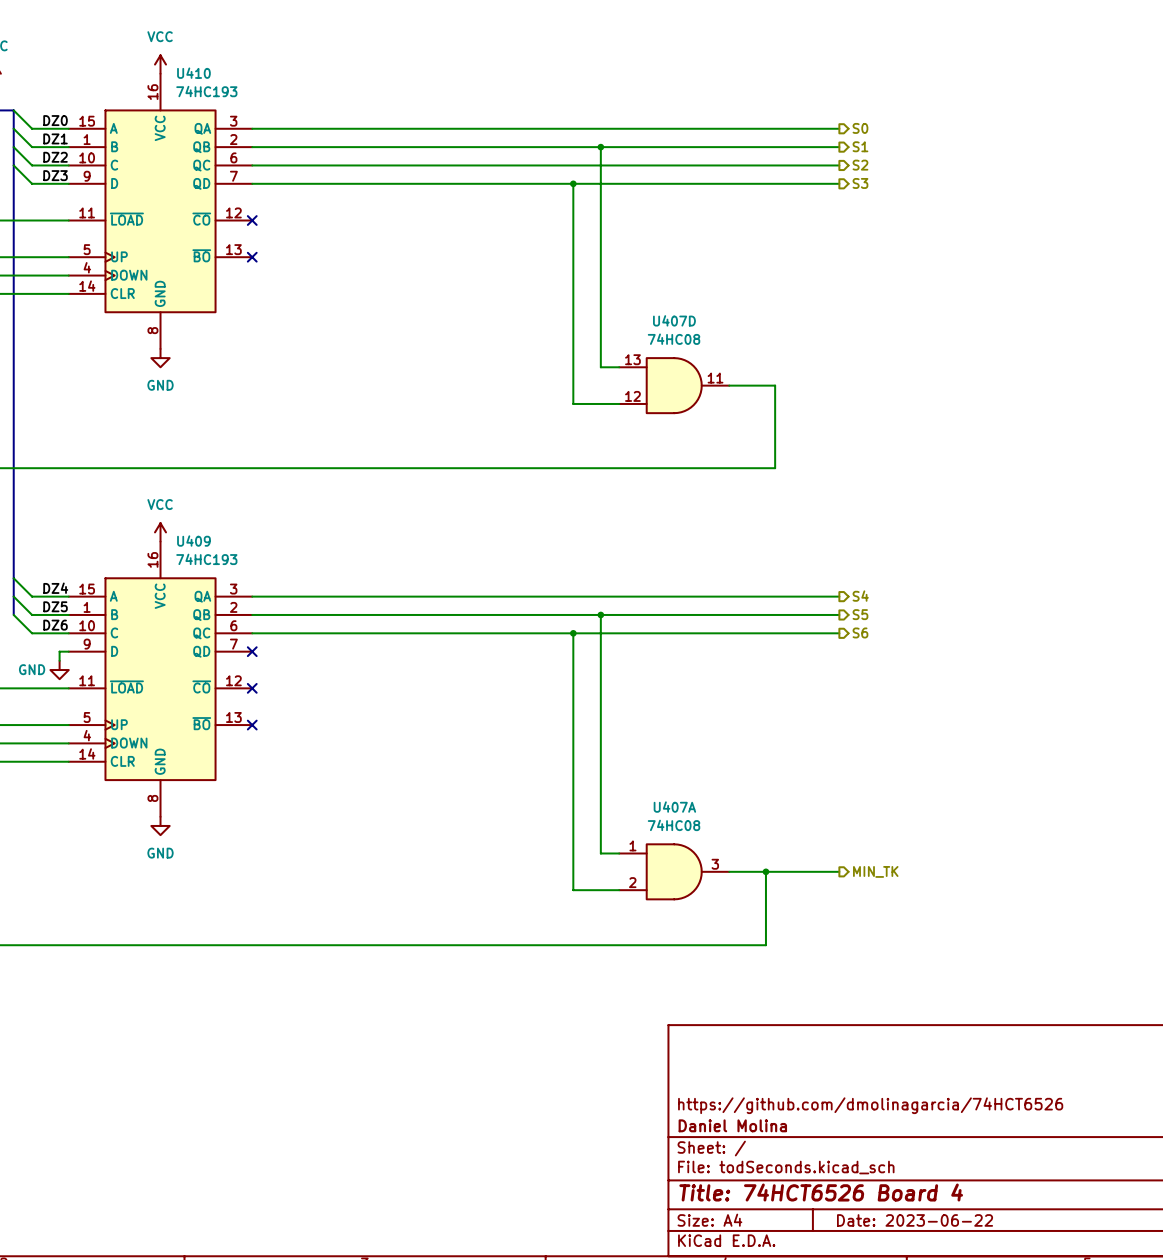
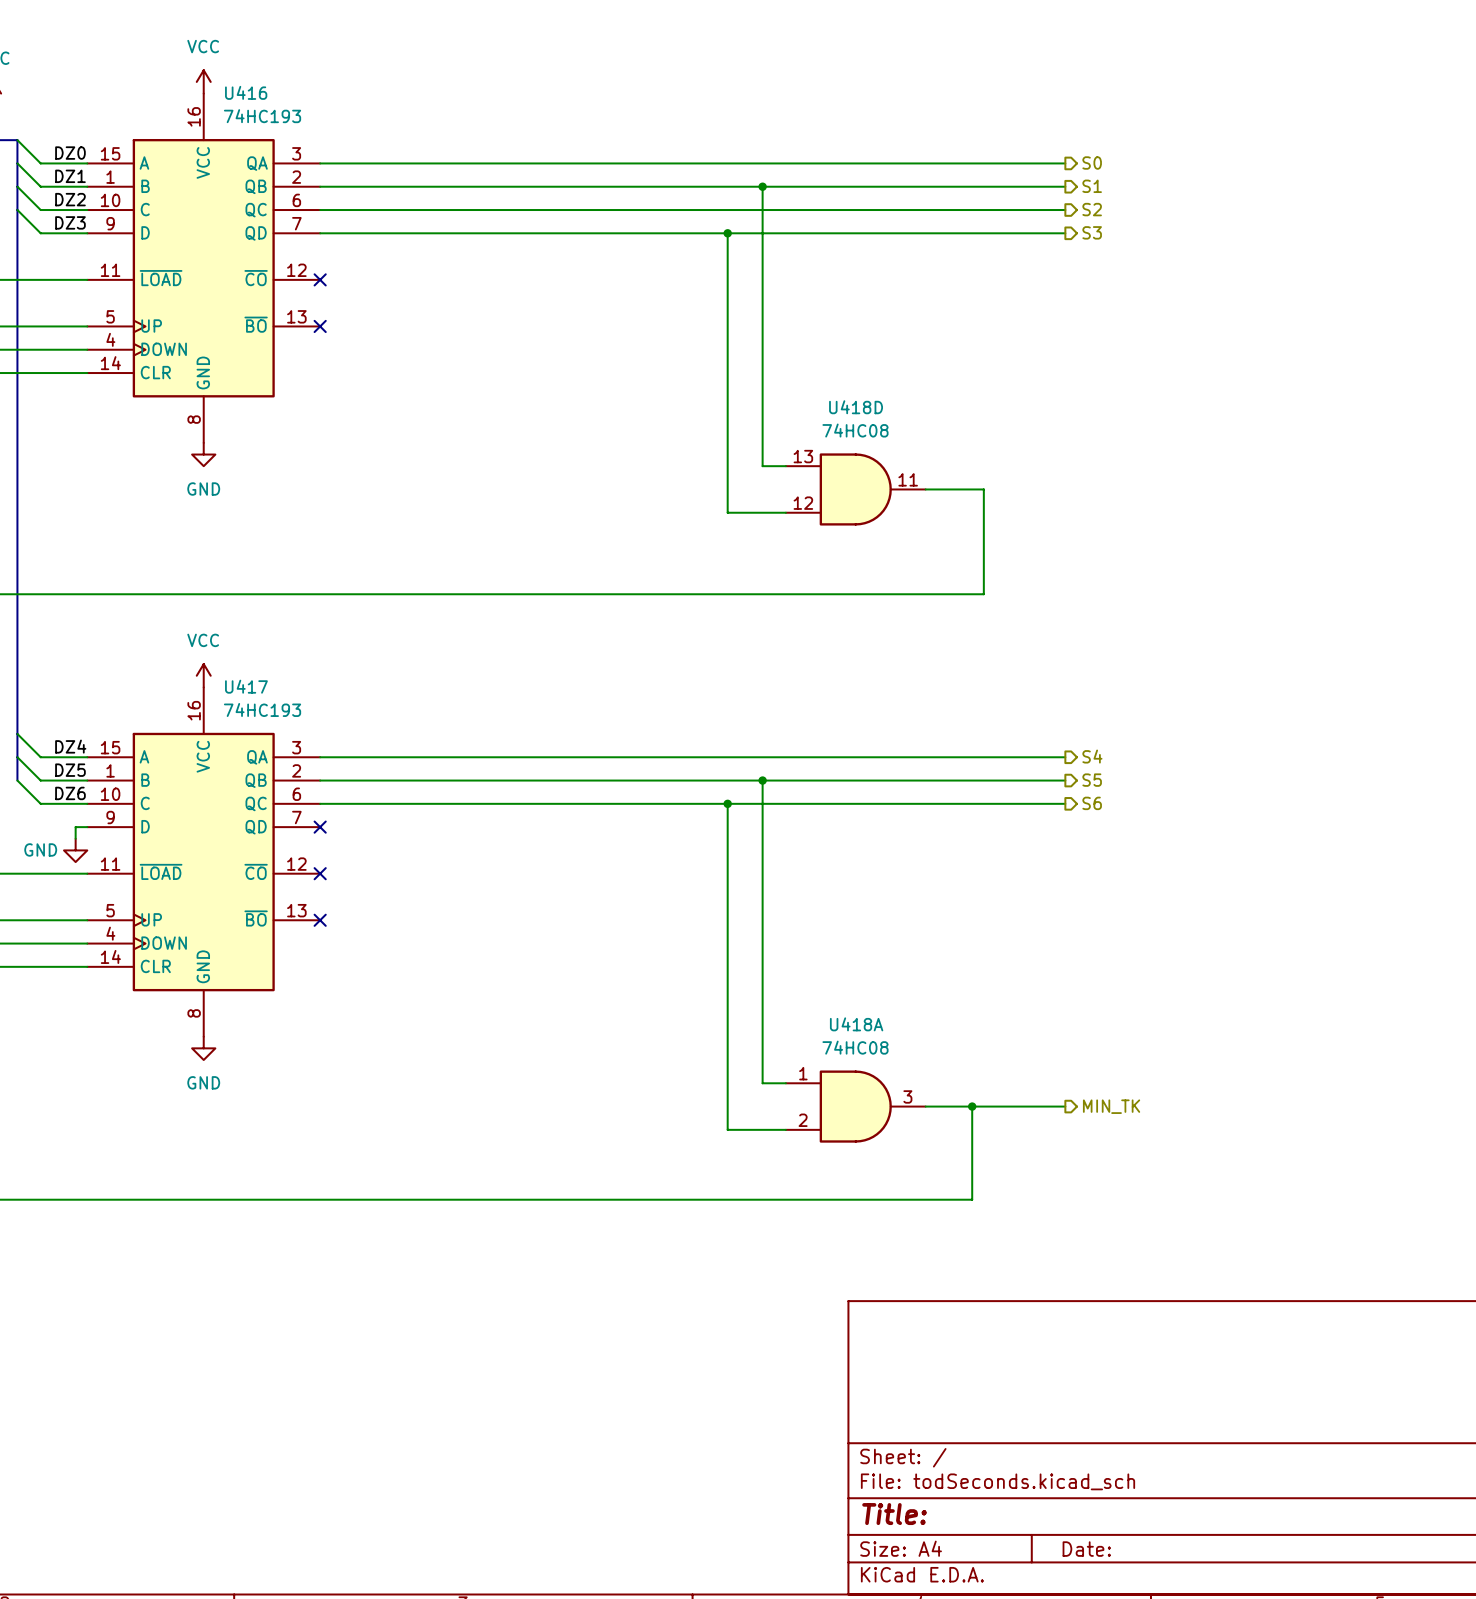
U410 name: U410 (193, 73) -> U416 (246, 92)
U407D name: U407D (674, 320) -> U418D (856, 407)
U409 name: U409 (193, 541) -> U417 (246, 686)
U407A name: U407A (674, 807) -> U418A (856, 1024)
title block: https://github.com/dmolinagarcia/74HCT6526 (870, 1105) -> none
title block: Daniel Molina (732, 1125) -> none
title block: Title: 74HCT6526 Board 4 (821, 1192) -> Title: (894, 1514)
title block: Date: 2023-06-22 (915, 1220) -> Date: (1086, 1549)

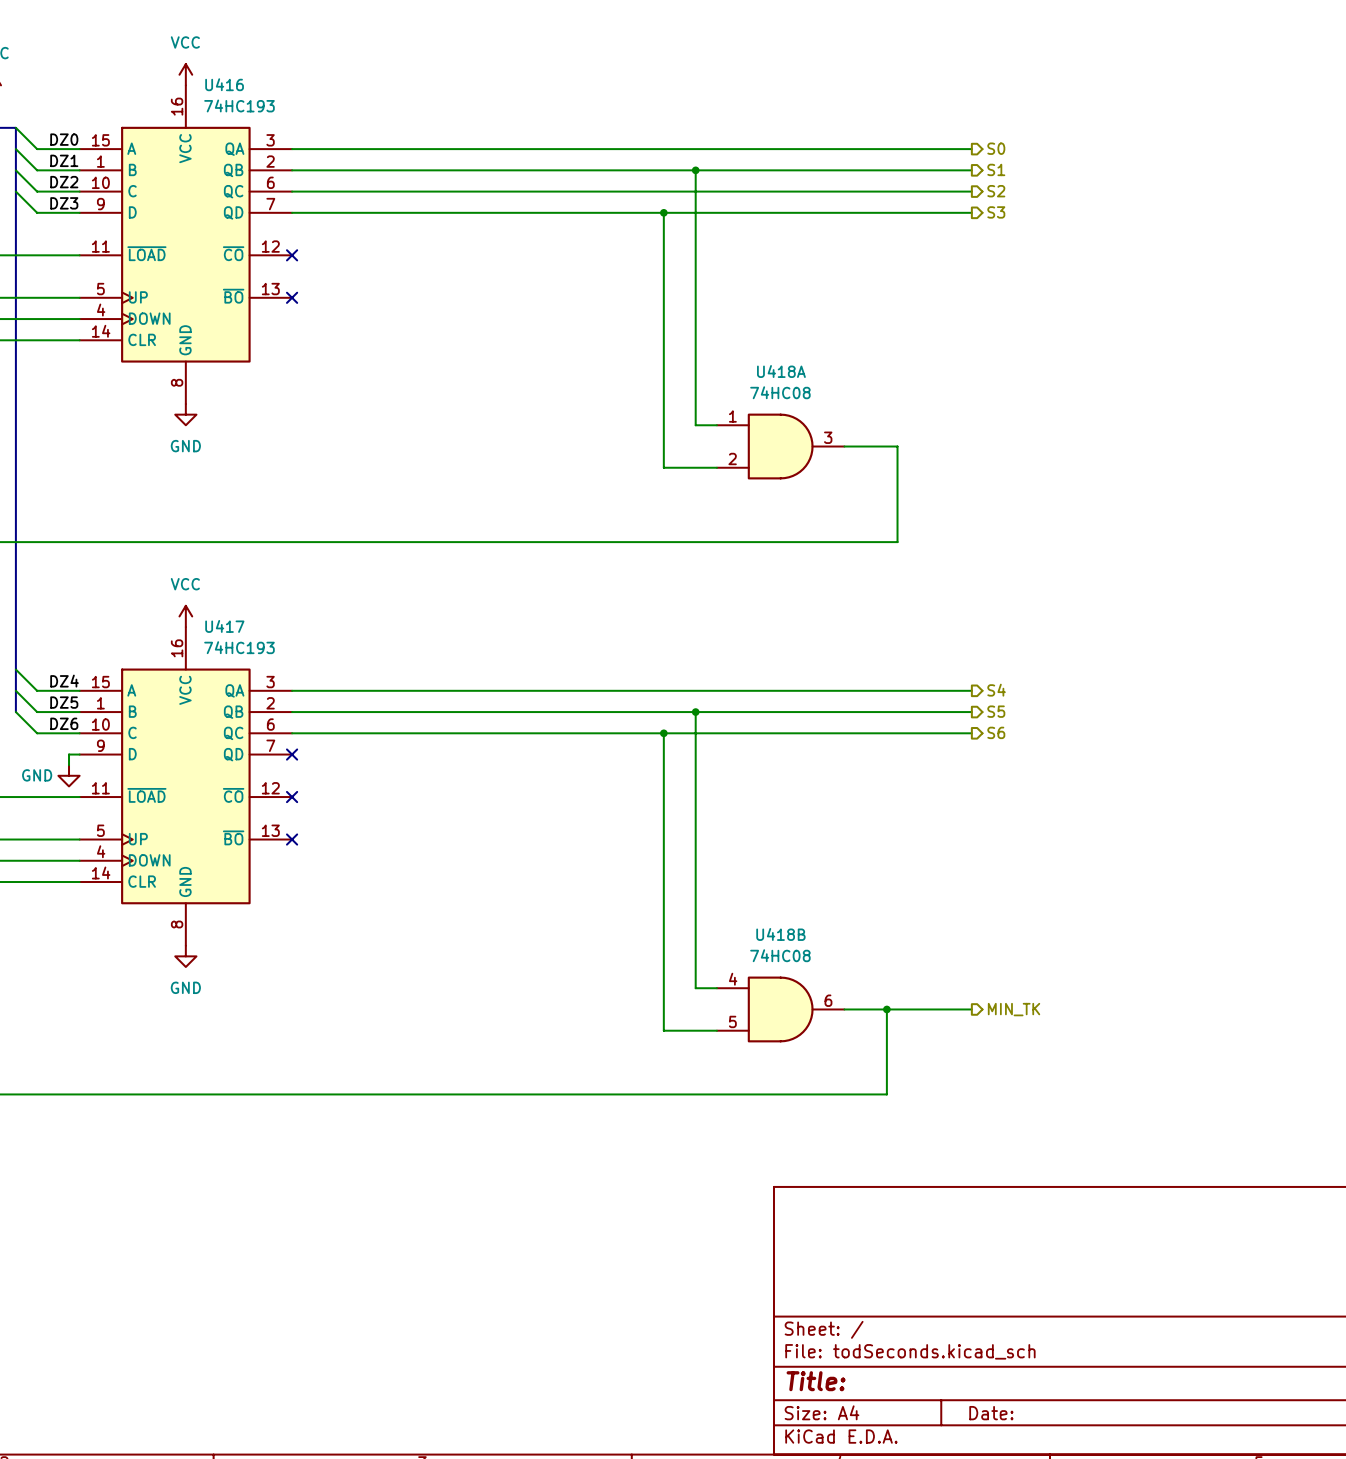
U418D: 74HC08 (855, 489) -> none
U418A position: (855, 1106) -> (780, 446)
U418B: none -> 74HC08 (780, 1009)

